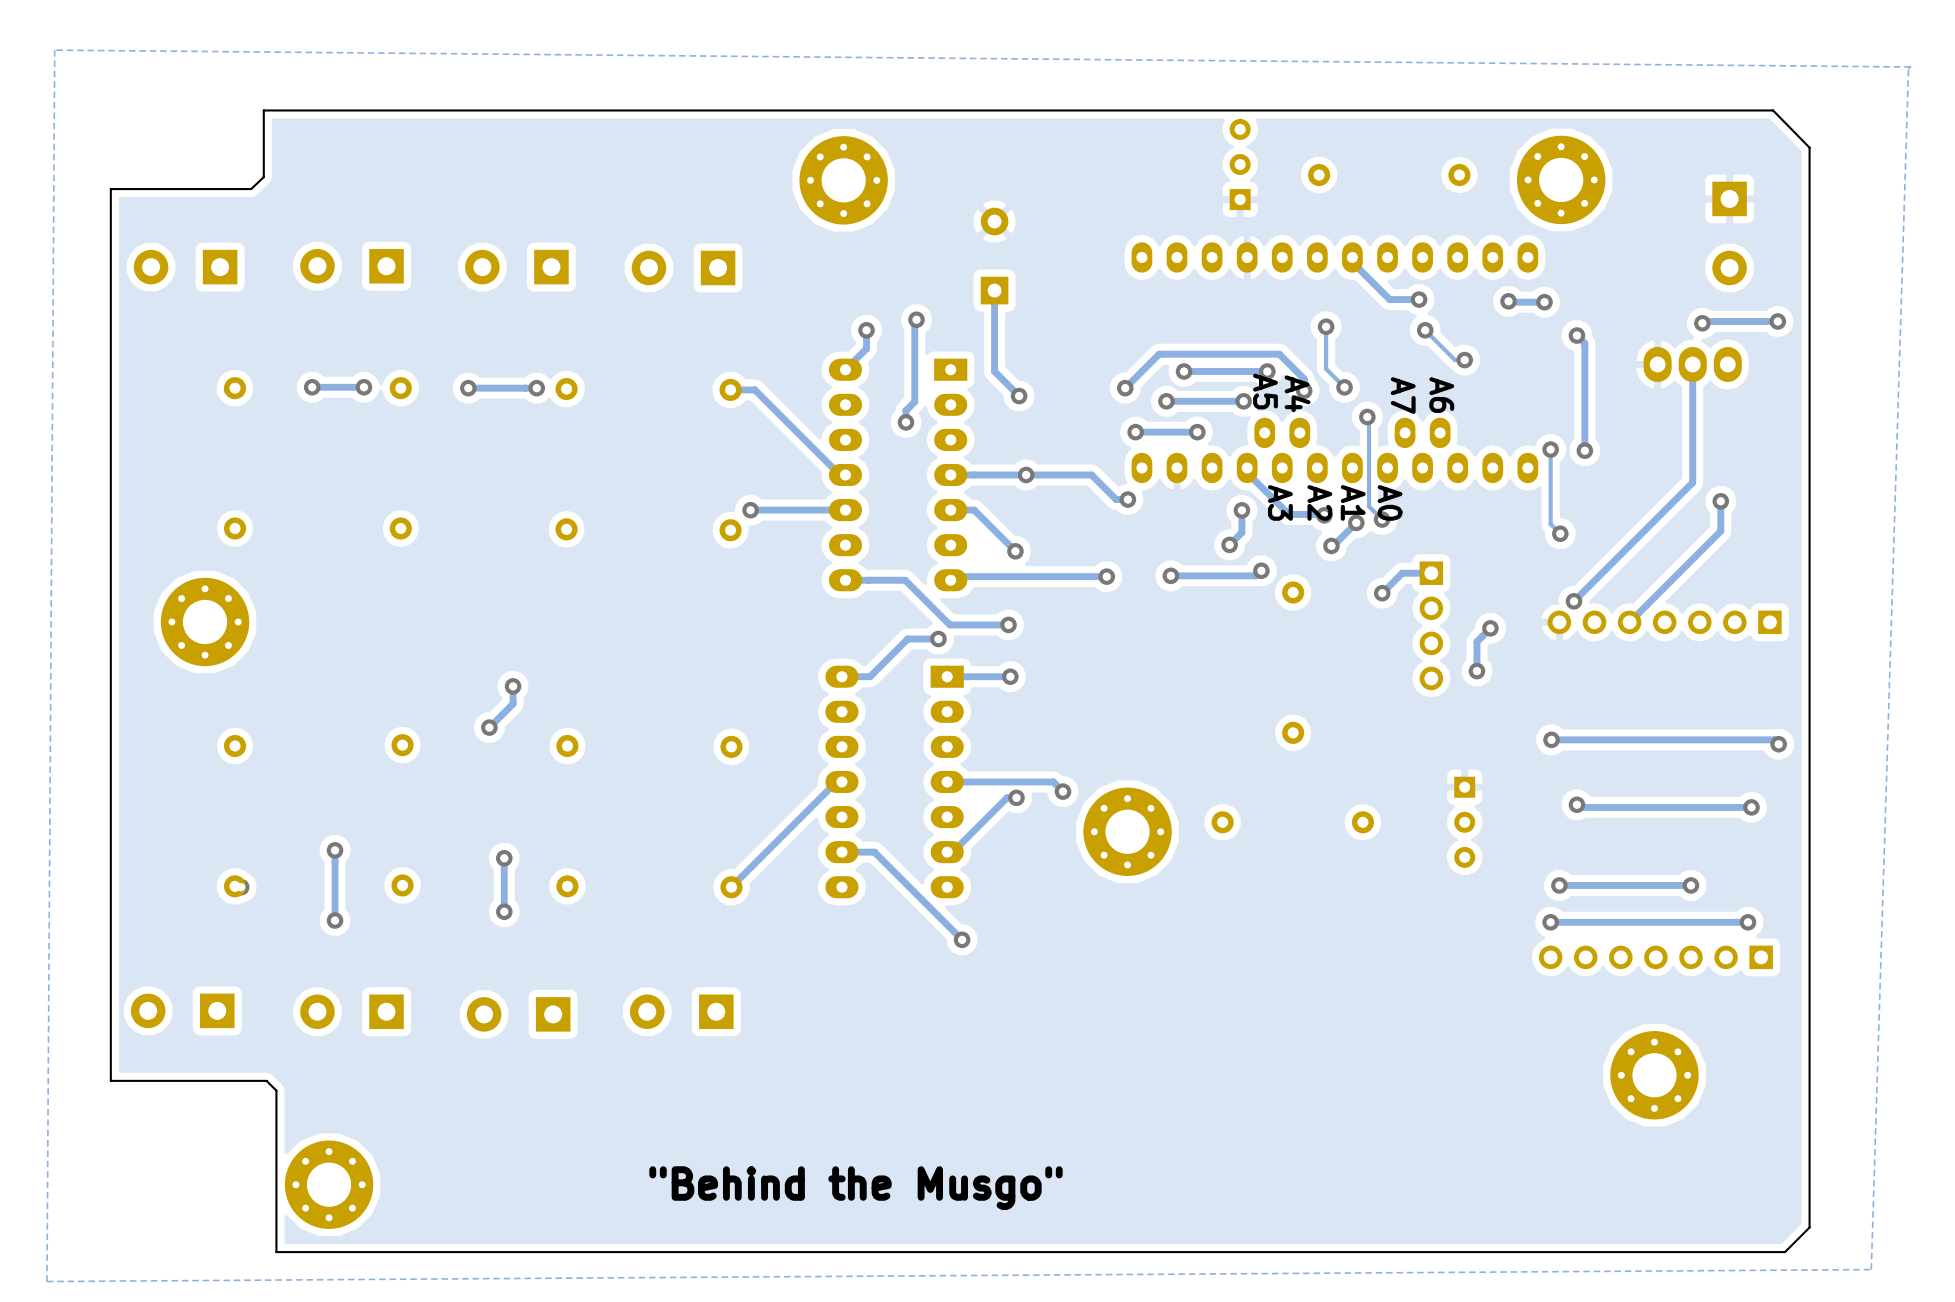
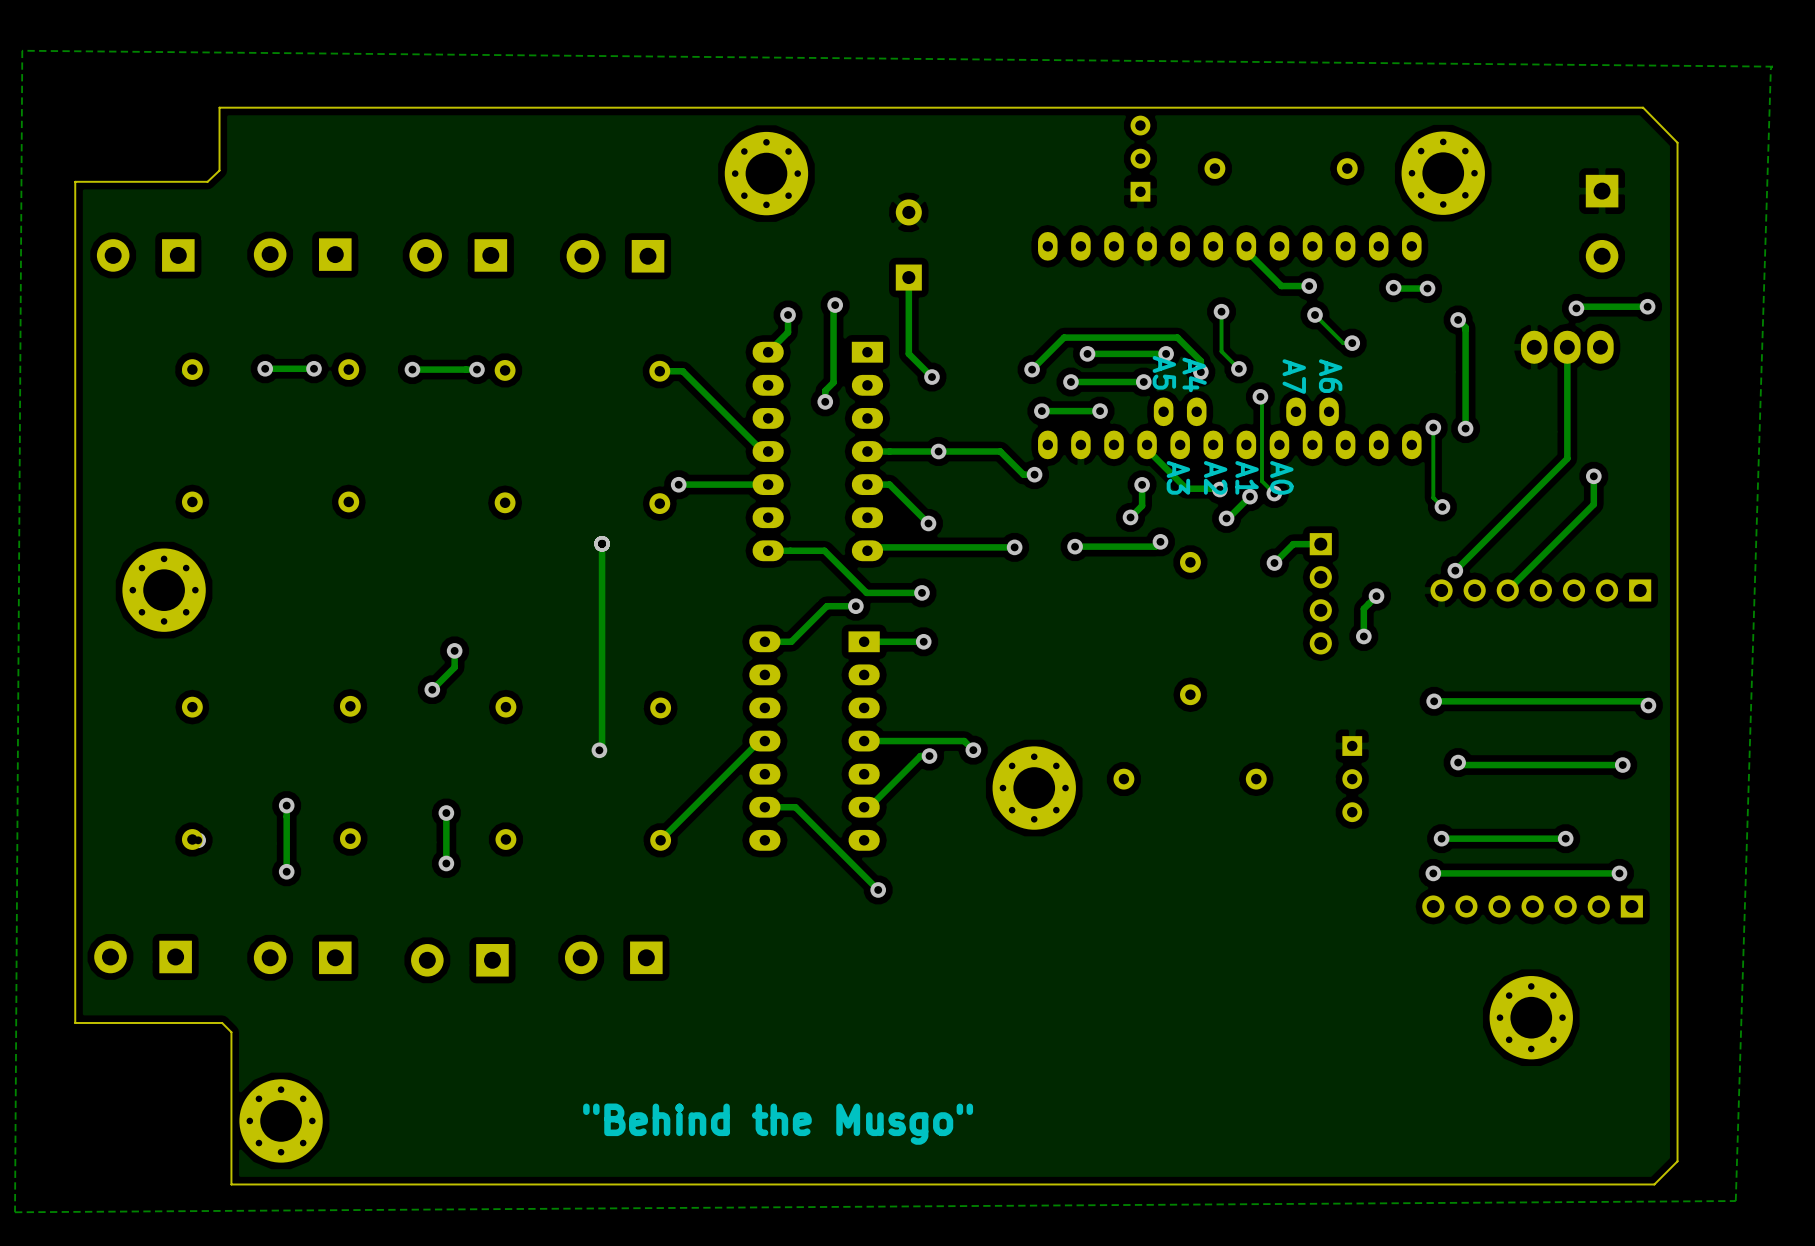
track: none -> (602, 543) (602, 747) (599, 750)
via: none -> (602, 543)
via: none -> (599, 750)

